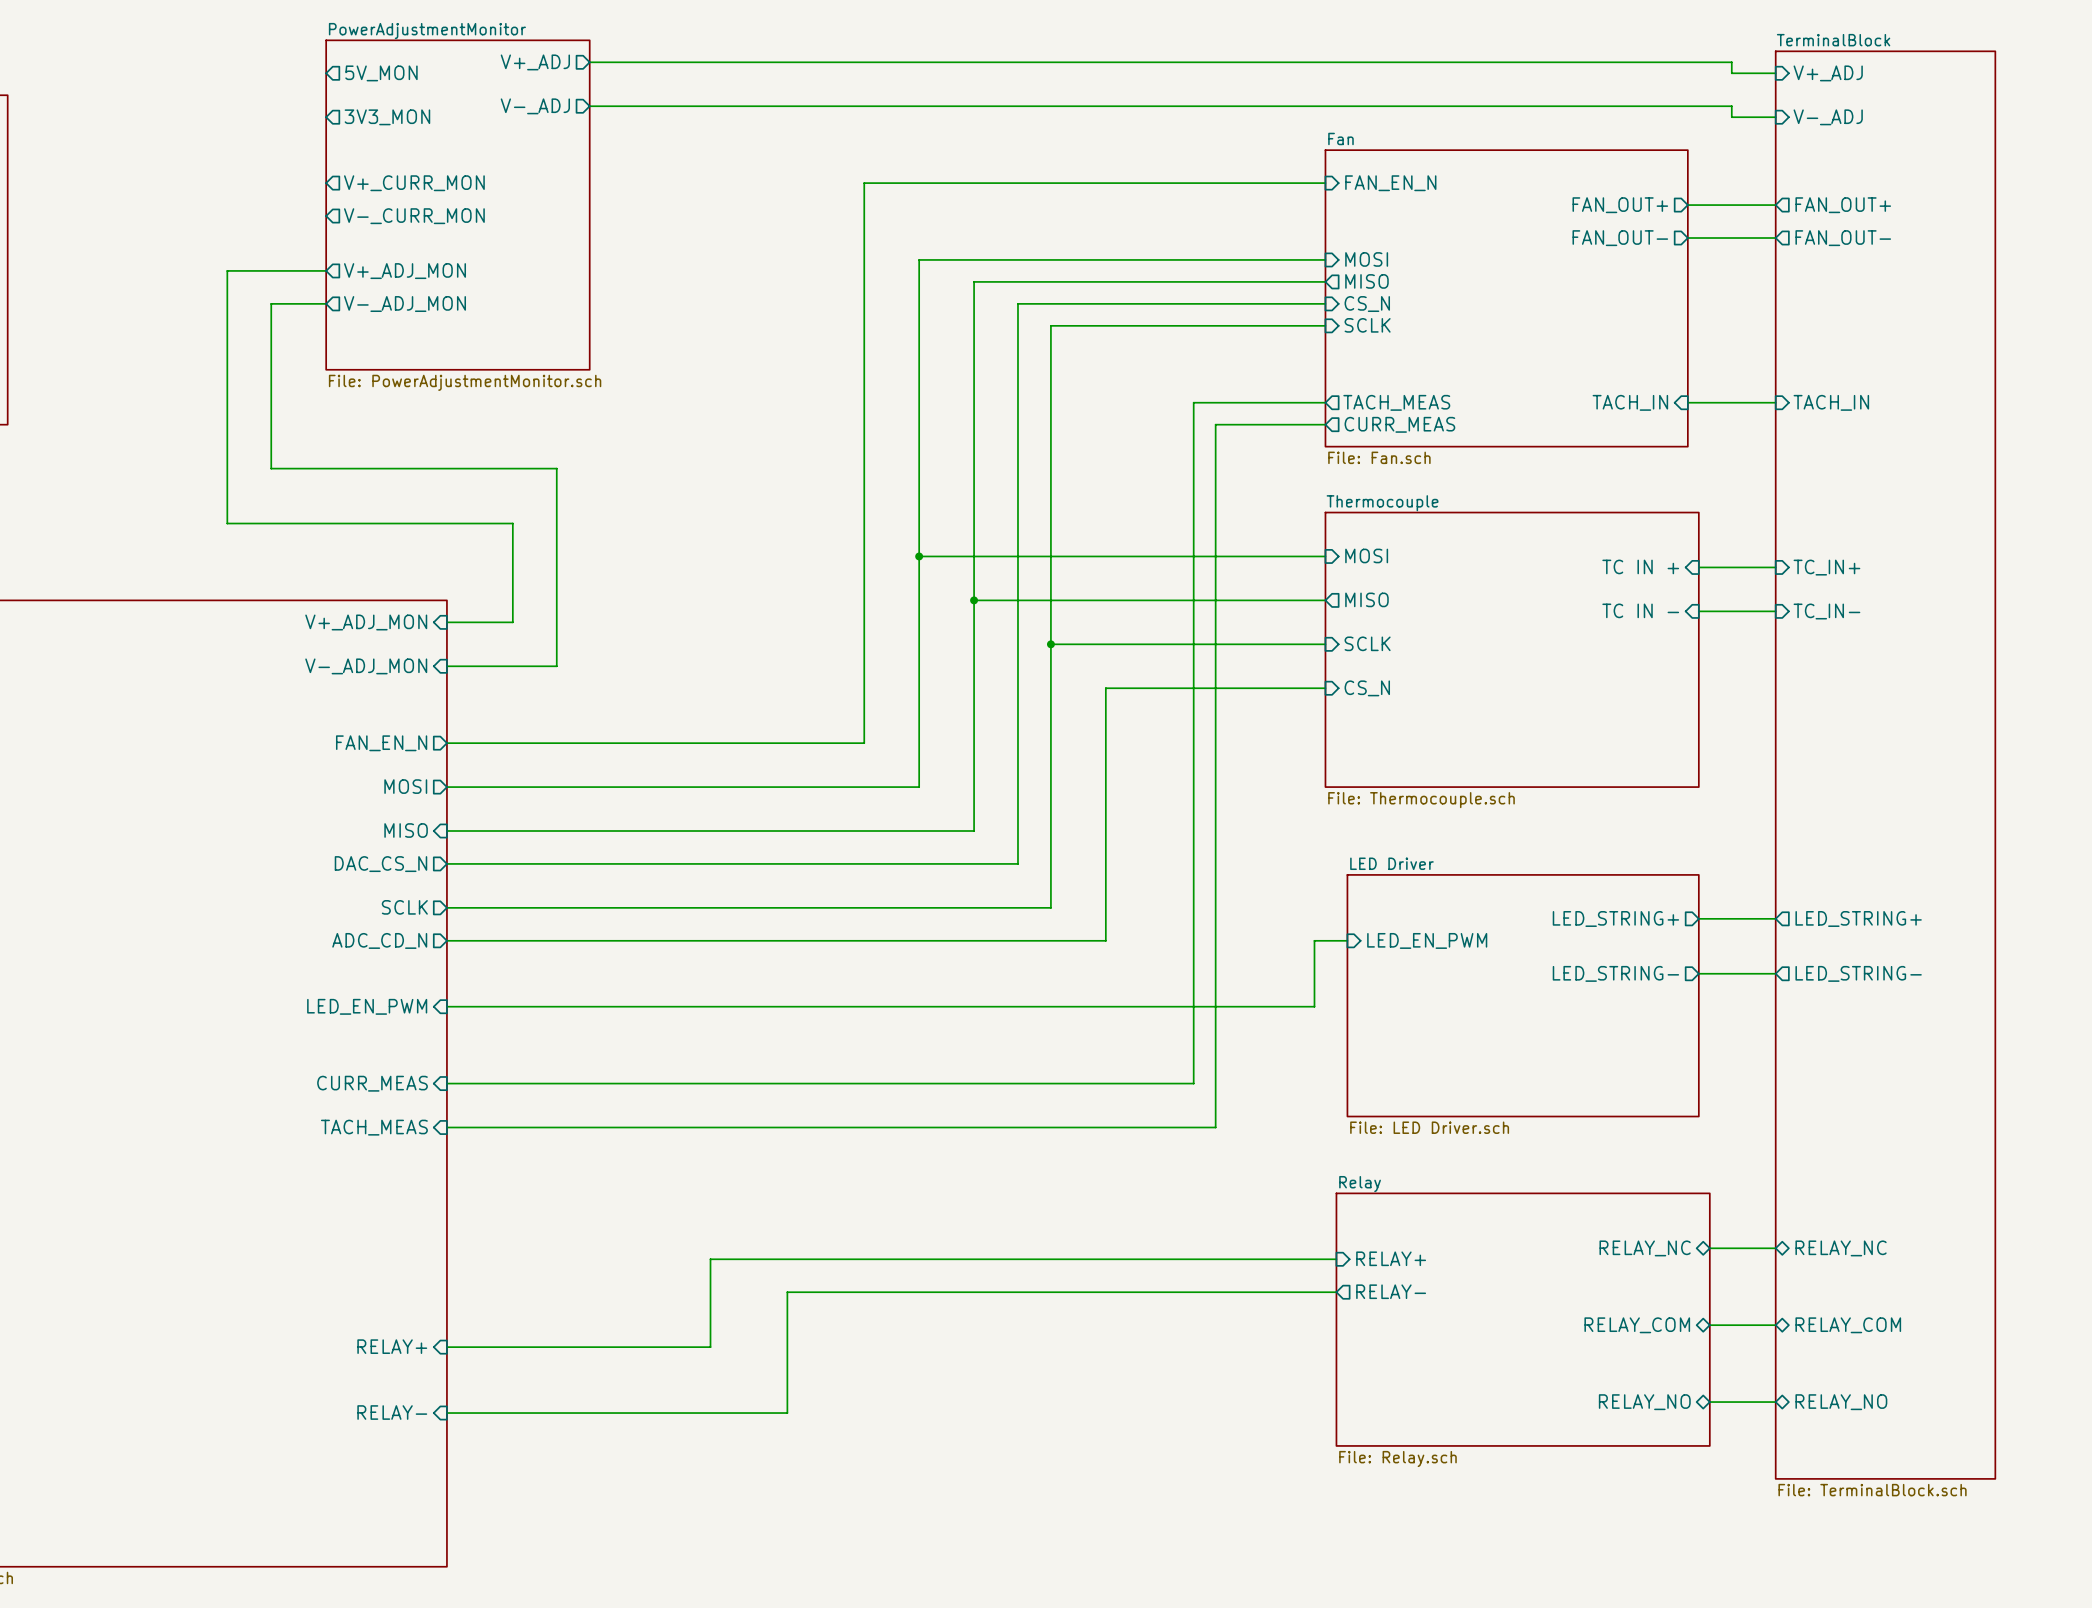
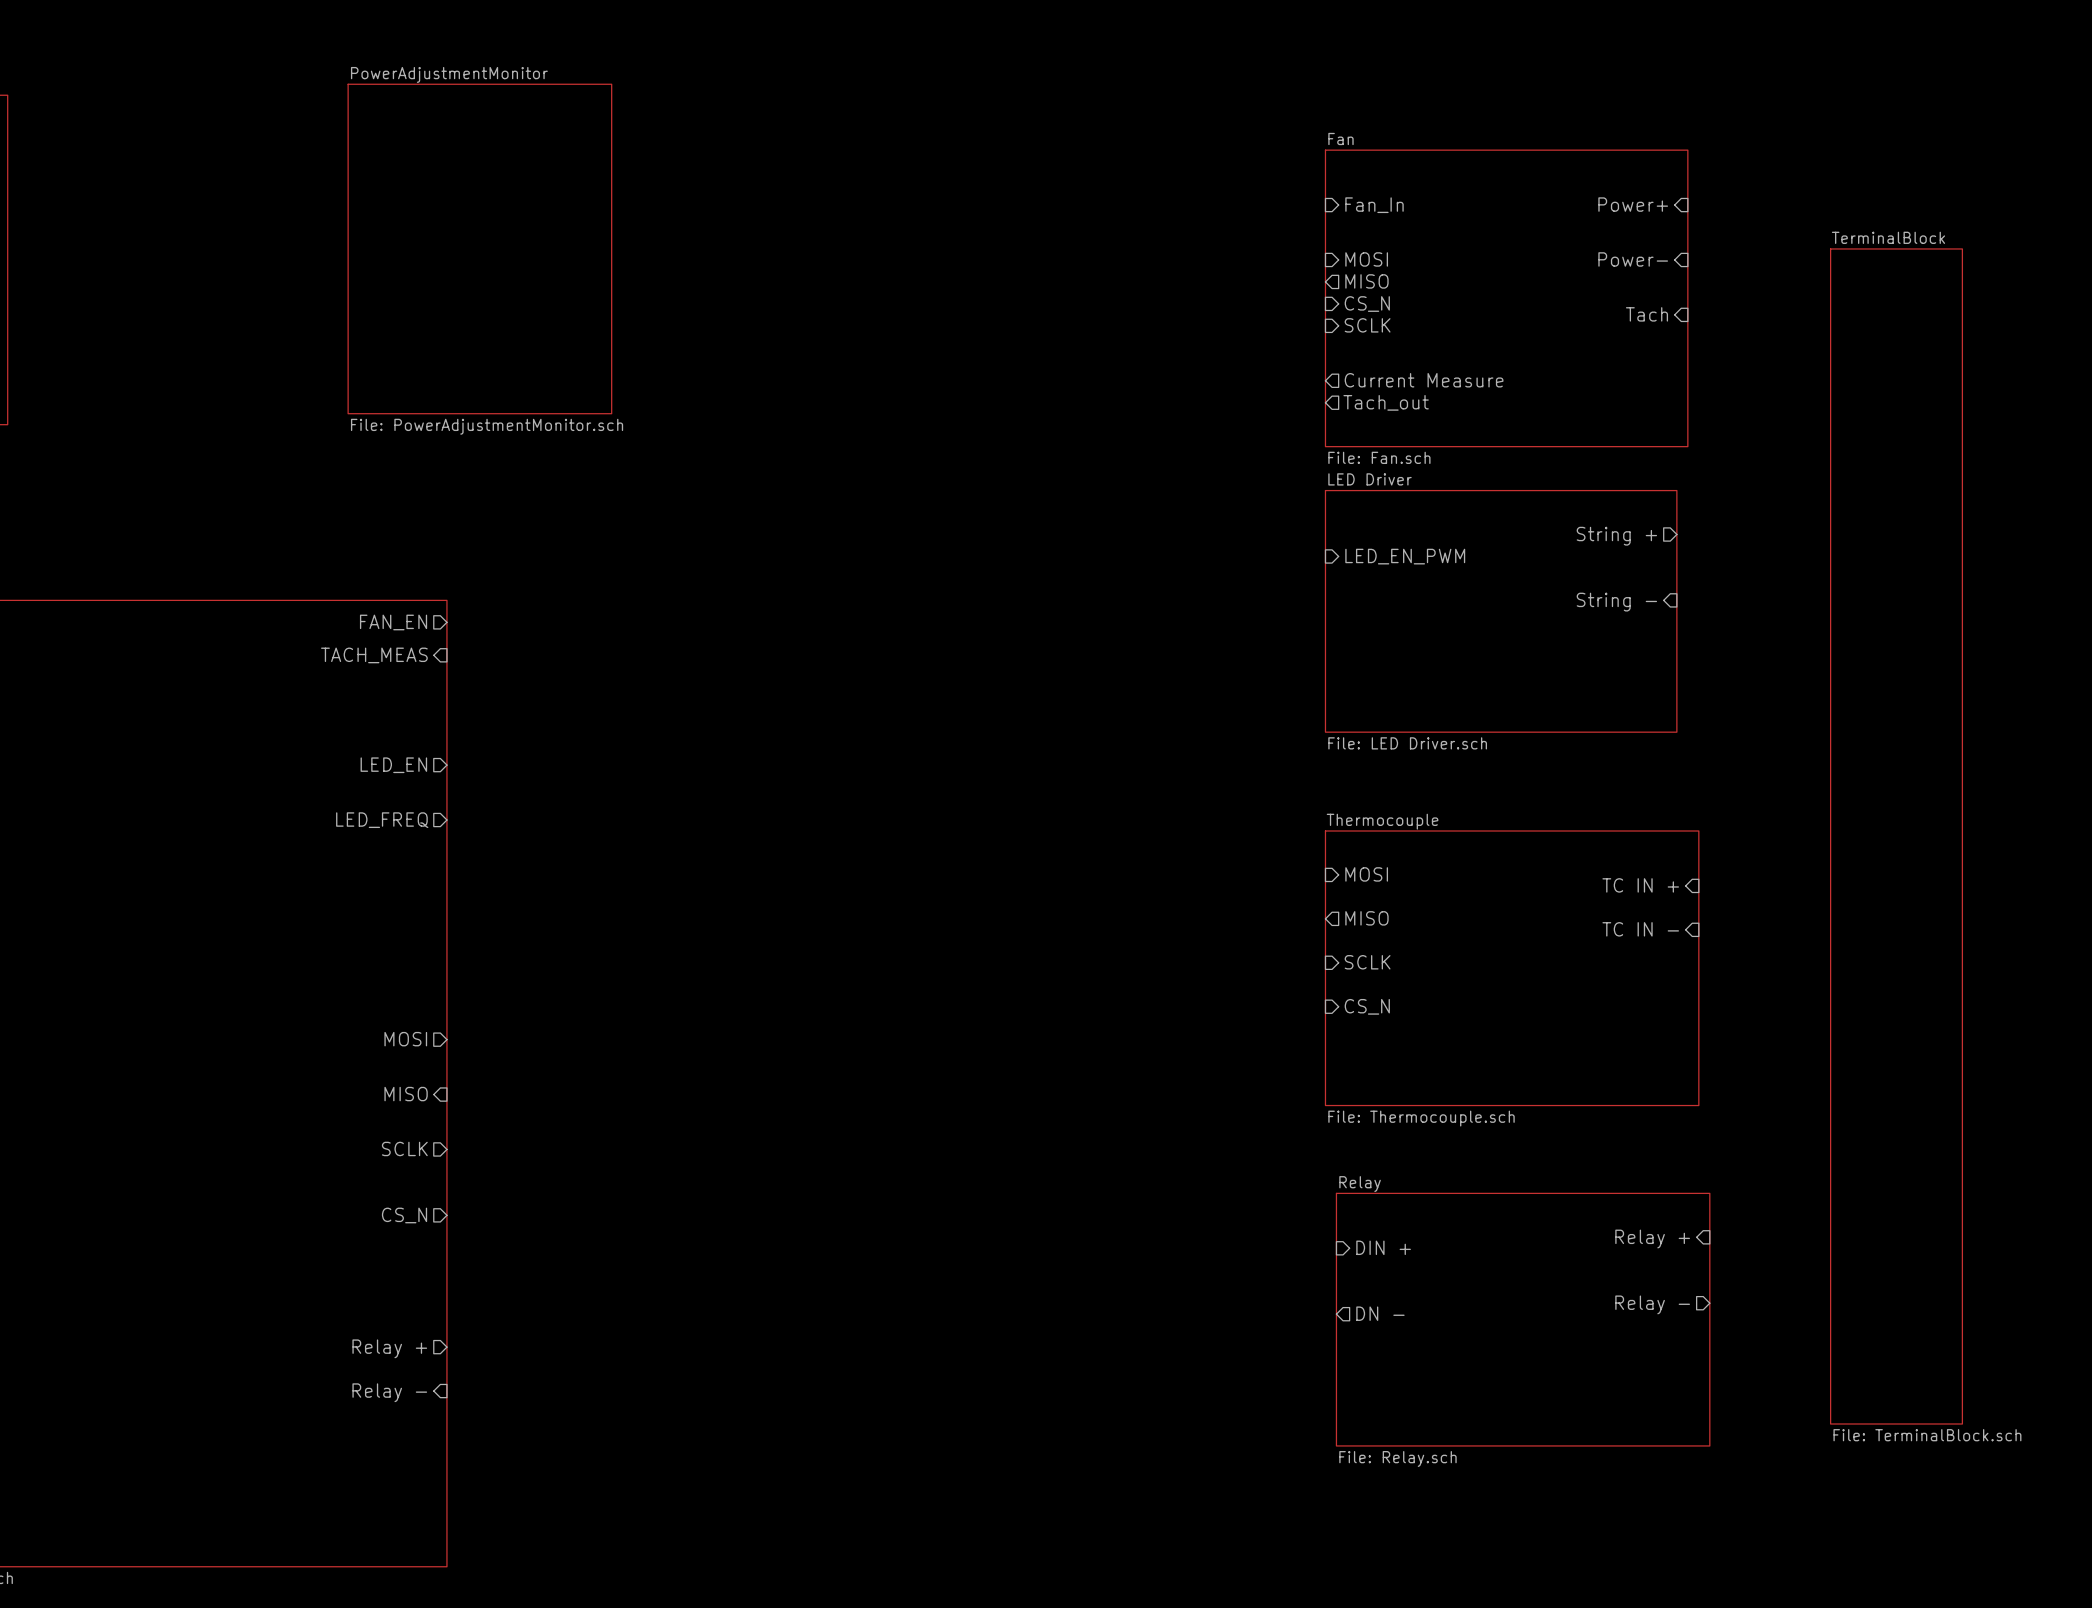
sheet pin: V+_ADJ (535, 62) -> none
wire: (589, 62) (1731, 62) (1731, 73) (1775, 73) -> none
sheet pin: 5V_MON (381, 73) -> none
sheet pin: V+_ADJ (1828, 73) -> none
sheet pin: V-_ADJ (535, 106) -> none
wire: (589, 106) (1731, 106) (1731, 117) (1775, 117) -> none
sheet pin: 3V3_MON (387, 117) -> none
sheet pin: V-_ADJ (1828, 117) -> none
sheet pin: V+_CURR_MON (414, 183) -> none
wire: (1325, 183) (864, 183) (864, 743) (446, 743) -> none
sheet pin: FAN_EN_N (1390, 183) -> none
sheet PowerAdjustmentMonitor position: (457, 205) -> (479, 248)
sheet pin: none -> Fan_In (1374, 205)
sheet pin shape: output (1620, 205) -> input (1633, 204)
sheet pin: FAN_OUT+ (1620, 205) -> Power+ (1633, 204)
wire: (1687, 205) (1775, 205) -> none
sheet pin: FAN_OUT+ (1843, 205) -> none
sheet pin: V-_CURR_MON (414, 216) -> none
sheet pin: FAN_OUT- (1620, 238) -> none
wire: (1687, 238) (1775, 238) -> none
sheet pin: FAN_OUT- (1843, 238) -> none
wire: (1325, 259) (919, 259) (919, 787) (446, 787) -> none
sheet pin: none -> Power- (1633, 259)
wire: (326, 270) (227, 270) (227, 523) (512, 523) (512, 622) (446, 622) -> none
sheet pin: V+_ADJ_MON (404, 271) -> none
wire: (1325, 281) (974, 281) (974, 831) (446, 831) -> none
wire: (326, 303) (271, 303) (271, 468) (556, 468) (556, 666) (446, 666) -> none
wire: (1325, 303) (1017, 303) (1017, 863) (446, 863) -> none
sheet pin: V-_ADJ_MON (404, 304) -> none
sheet pin: none -> Tach (1646, 314)
wire: (1325, 325) (1050, 325) (1050, 907) (446, 907) -> none
sheet pin: none -> Current Measure (1424, 380)
wire: (1325, 402) (1193, 402) (1193, 1083) (446, 1083) -> none
sheet pin: TACH_MEAS (1396, 402) -> Tach_out (1386, 402)
sheet pin: TACH_IN (1630, 402) -> none
wire: (1687, 402) (1775, 402) -> none
sheet pin: TACH_IN (1831, 402) -> none
wire: (1325, 424) (1215, 424) (1215, 1127) (446, 1127) -> none
sheet pin: CURR_MEAS (1399, 424) -> none
sheet pin: none -> String + (1616, 536)
sheet pin: MOSI (1366, 555) -> LED_EN_PWM (1405, 556)
wire: (919, 556) (1325, 556) -> none
junction: (919, 556) -> none
sheet pin: TC IN + (1640, 566) -> none
wire: (1698, 567) (1775, 567) -> none
sheet pin: TC_IN+ (1826, 567) -> none
sheet pin: MISO (1366, 599) -> none
wire: (974, 600) (1325, 600) -> none
junction: (974, 600) -> none
sheet pin: none -> String - (1616, 602)
sheet pin: TC IN - (1640, 610) -> none
sheet LED Driver: none -> File: LED Driver.sch (1501, 611)
wire: (1698, 611) (1775, 611) -> none
sheet pin: TC_IN- (1826, 611) -> none
sheet pin shape: input (366, 622) -> output (393, 622)
sheet pin: V+_ADJ_MON (366, 622) -> FAN_EN (393, 622)
sheet pin: SCLK (1367, 643) -> none
wire: (1050, 644) (1325, 644) -> none
junction: (1050, 644) -> none
sheet Thermocouple: File: Thermocouple.sch (1512, 649) -> none
sheet pin: none -> TACH_MEAS (374, 655)
sheet pin: V-_ADJ_MON (366, 666) -> none
wire: (1325, 688) (1105, 688) (1105, 940) (446, 940) -> none
sheet pin: CS_N (1367, 688) -> none
sheet pin: FAN_EN_N (381, 743) -> none
sheet pin: none -> LED_EN (393, 765)
sheet TerminalBlock: File: TerminalBlock.sch (1885, 765) -> none
sheet pin: MOSI (405, 786) -> none
sheet pin: none -> LED_FREQ (382, 820)
sheet pin: MISO (406, 830) -> none
sheet TerminalBlock: none -> File: TerminalBlock.sch (1896, 836)
sheet pin: DAC_CS_N (380, 864) -> none
sheet pin: none -> MOSI (1366, 874)
sheet pin: none -> TC IN + (1640, 885)
sheet pin: SCLK (404, 907) -> none
sheet pin: none -> MISO (1366, 918)
sheet pin: LED_STRING+ (1615, 918) -> none
wire: (1698, 918) (1775, 918) -> none
sheet pin: LED_STRING+ (1858, 918) -> none
sheet pin: none -> TC IN - (1640, 929)
sheet pin: ADC_CD_N (379, 940) -> none
wire: (1347, 940) (1314, 940) (1314, 1006) (446, 1006) -> none
sheet pin: LED_EN_PWM (1427, 940) -> none
sheet pin: none -> SCLK (1367, 962)
sheet Thermocouple: none -> File: Thermocouple.sch (1512, 968)
sheet pin: LED_STRING- (1615, 973) -> none
wire: (1698, 973) (1775, 973) -> none
sheet pin: LED_STRING- (1858, 973) -> none
sheet LED Driver: File: LED Driver.sch (1523, 995) -> none
sheet pin: LED_EN_PWM (367, 1006) -> none
sheet pin: none -> CS_N (1367, 1006)
sheet pin: none -> MOSI (405, 1039)
sheet pin: CURR_MEAS (372, 1083) -> none
sheet pin: none -> MISO (406, 1094)
sheet pin: TACH_MEAS (374, 1127) -> none
sheet pin: none -> SCLK (404, 1148)
sheet pin: none -> CS_N (404, 1215)
sheet pin: none -> Relay + (1652, 1239)
sheet pin: none -> DIN + (1383, 1247)
sheet pin: RELAY_NC (1645, 1248) -> none
wire: (1709, 1248) (1775, 1248) -> none
sheet pin: RELAY_NC (1841, 1248) -> none
sheet pin: RELAY+ (1391, 1258) -> none
wire: (1336, 1259) (710, 1259) (710, 1347) (446, 1347) -> none
sheet pin: RELAY- (1391, 1291) -> none
wire: (1336, 1292) (787, 1292) (787, 1413) (446, 1413) -> none
sheet pin: none -> Relay - (1652, 1304)
sheet pin: none -> DN - (1380, 1313)
sheet pin: RELAY_COM (1637, 1325) -> none
wire: (1709, 1325) (1775, 1325) -> none
sheet pin: RELAY_COM (1848, 1325) -> none
sheet pin shape: input (392, 1346) -> output (389, 1348)
sheet pin: RELAY+ (392, 1346) -> Relay + (389, 1348)
sheet pin: none -> Relay - (389, 1392)
sheet pin: RELAY_NO (1644, 1402) -> none
wire: (1709, 1402) (1775, 1402) -> none
sheet pin: RELAY_NO (1841, 1402) -> none
sheet pin: RELAY- (392, 1412) -> none

